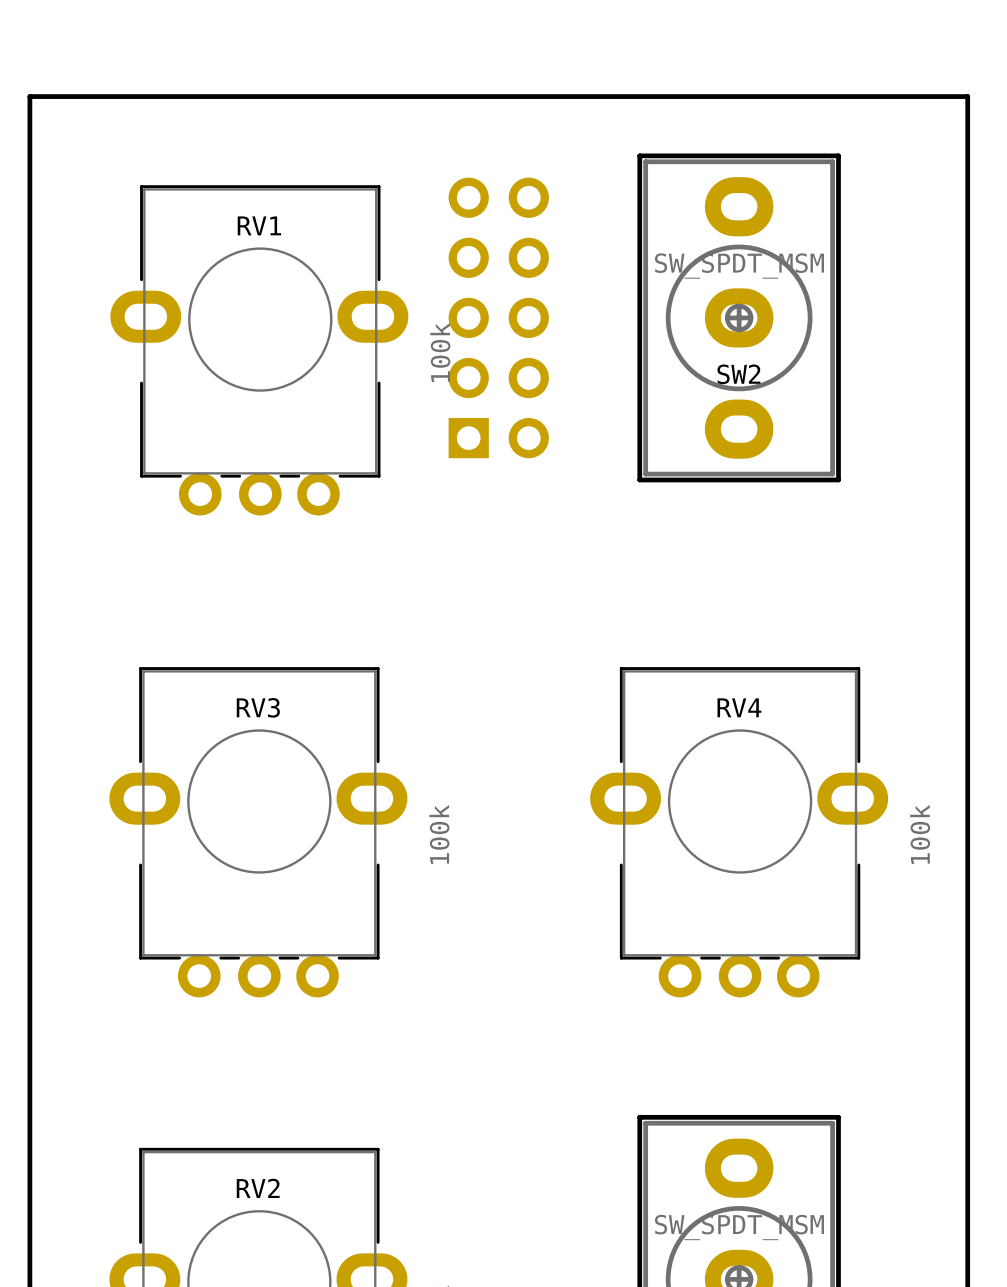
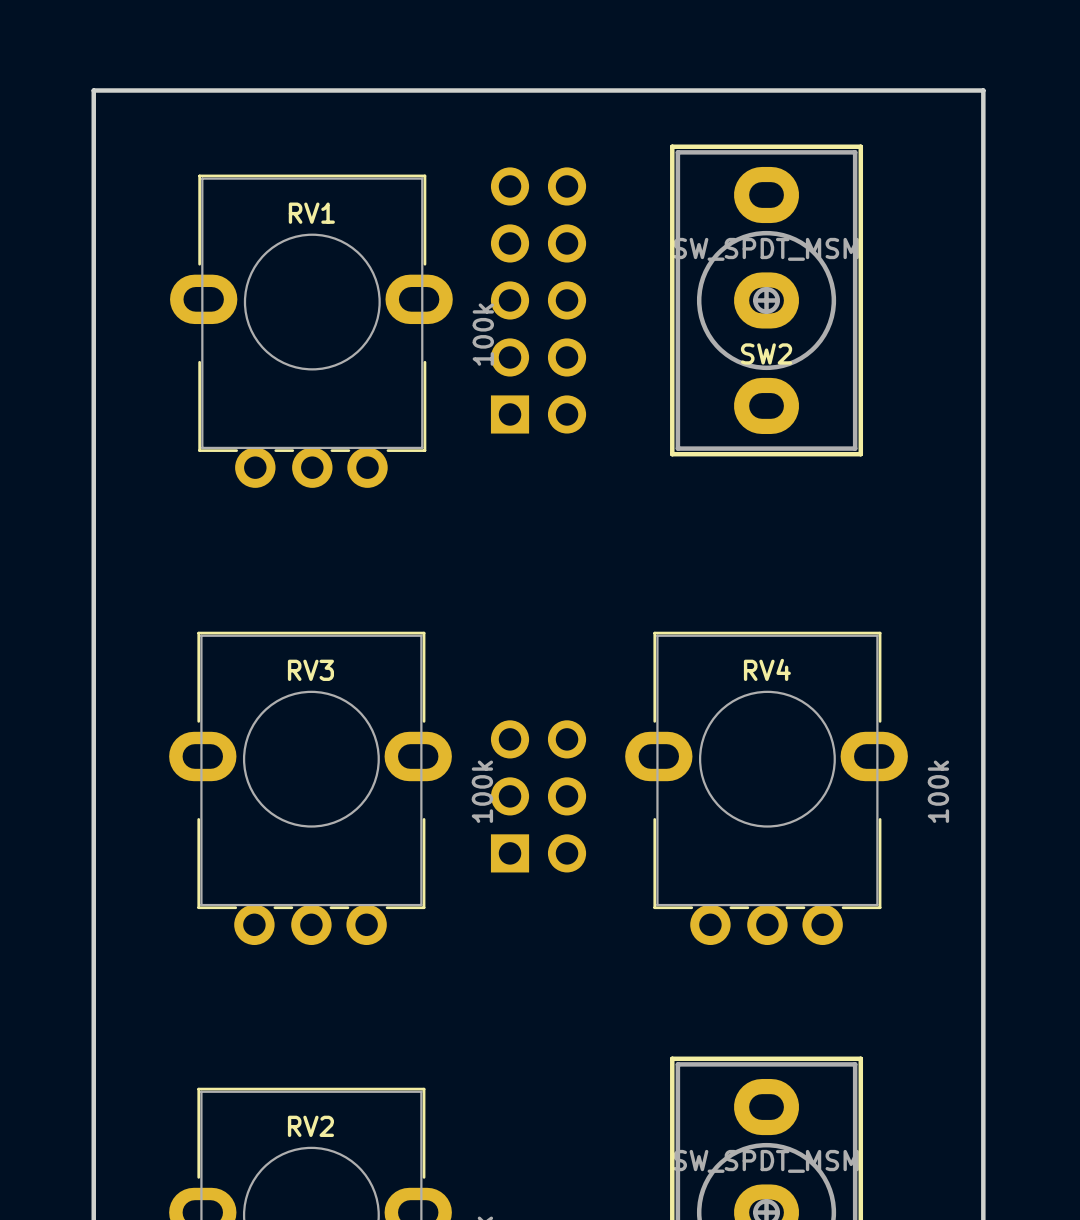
part: none -> (538, 796)

